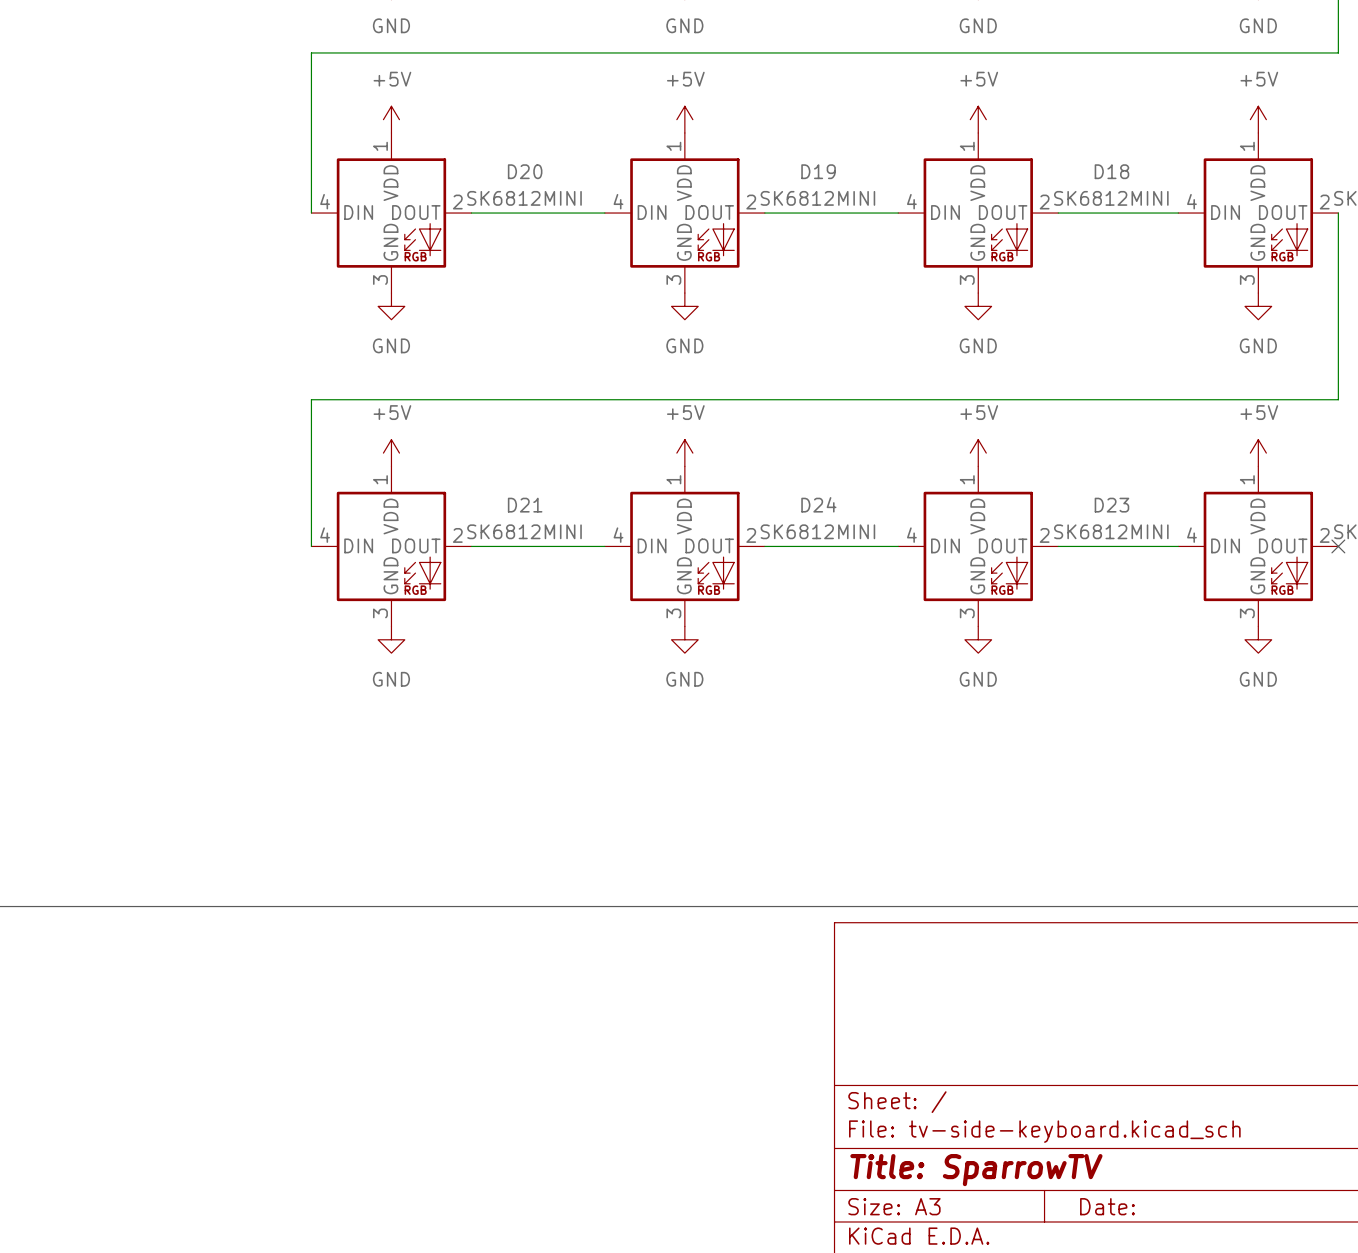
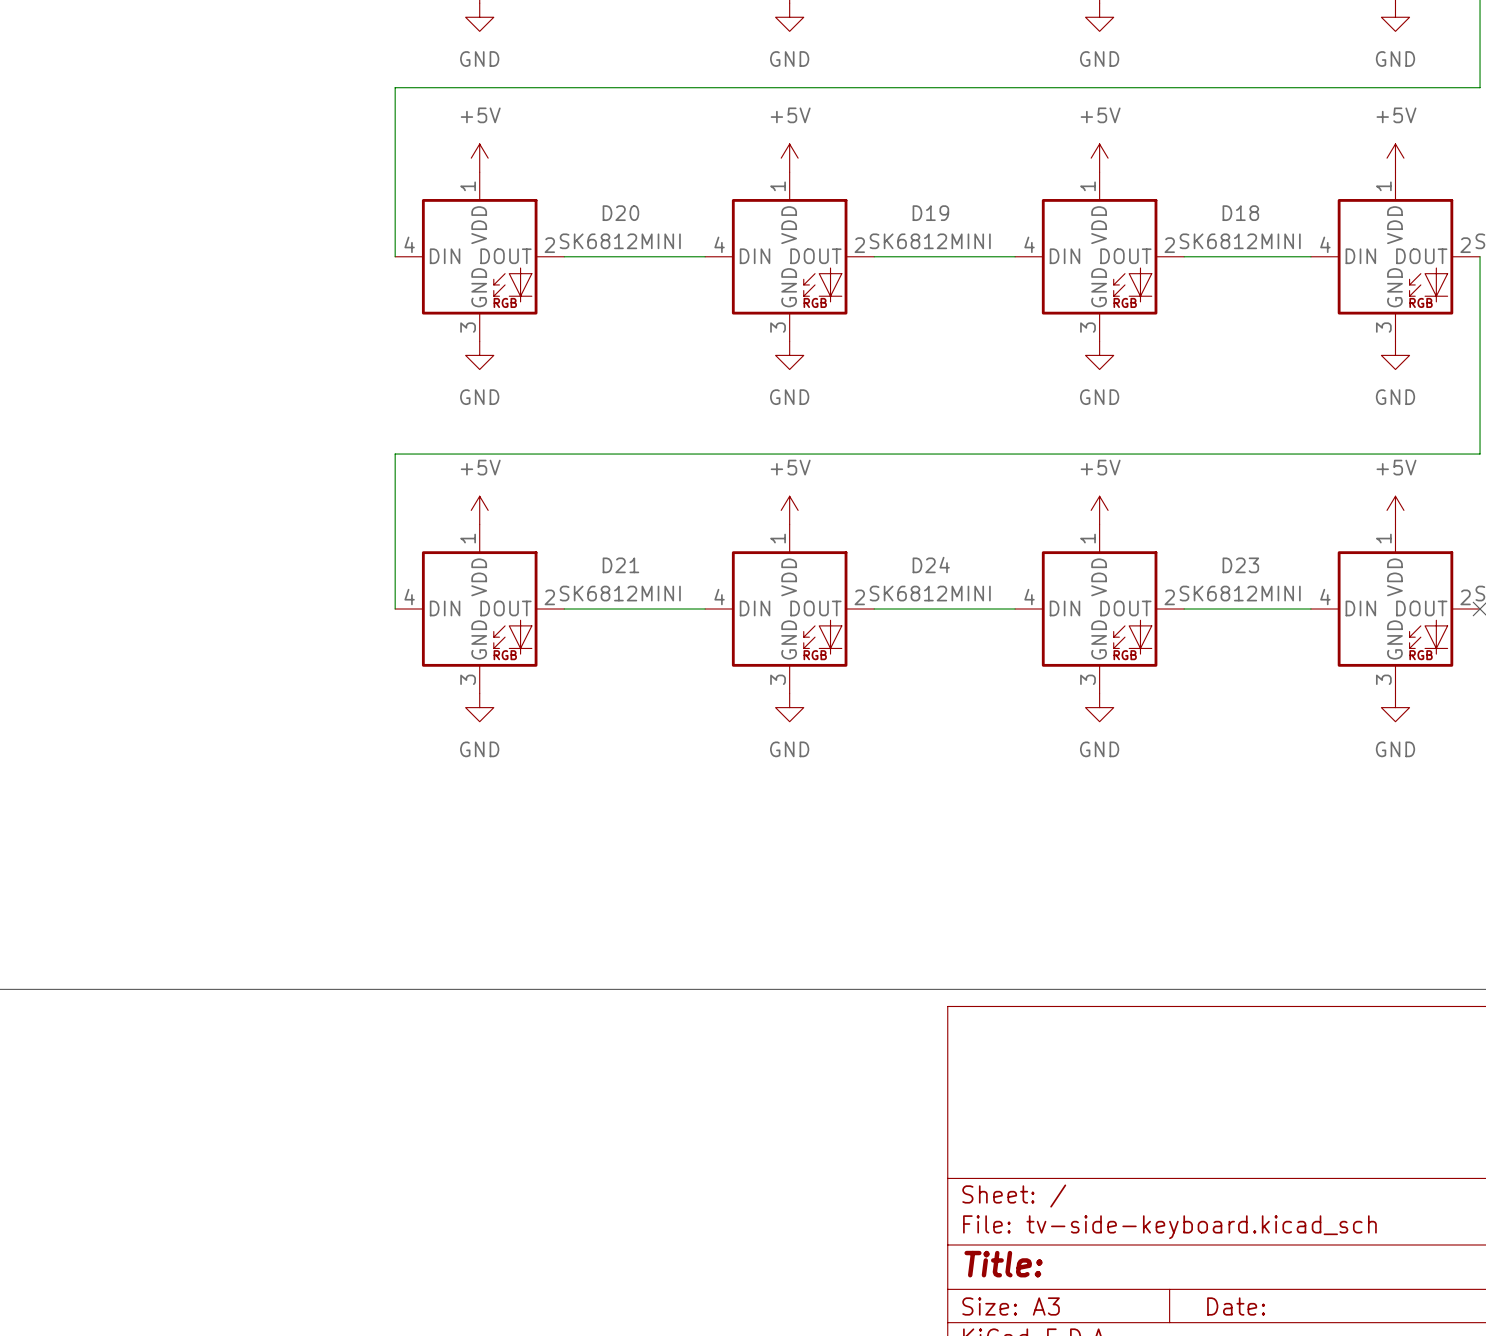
title block: Title: SparrowTV (976, 1170) -> Title: (1003, 1264)

